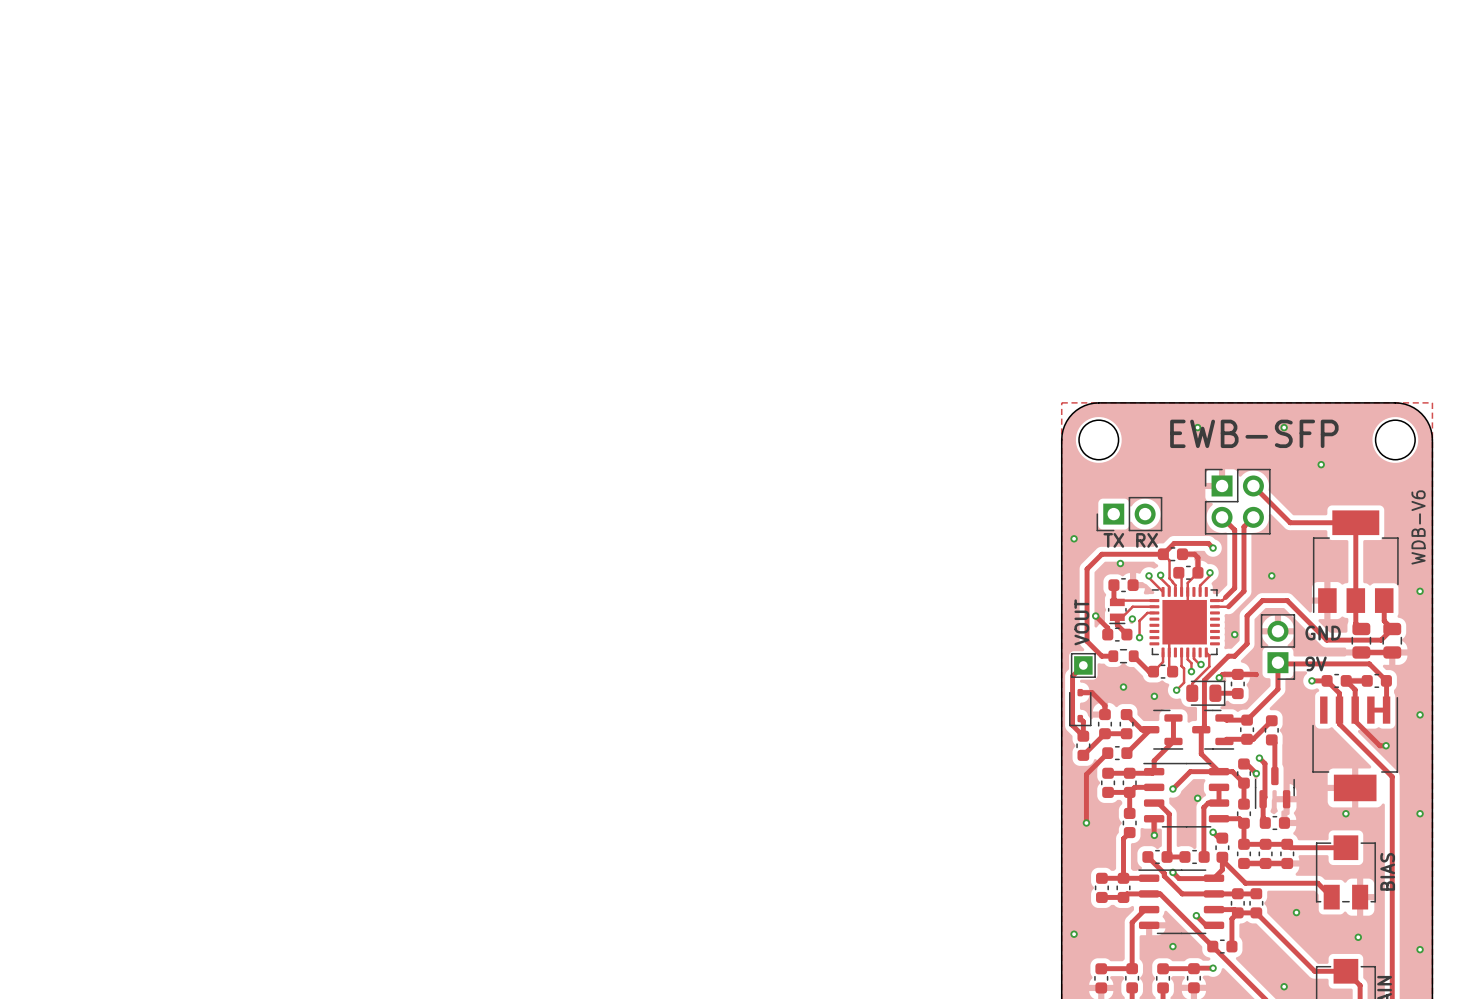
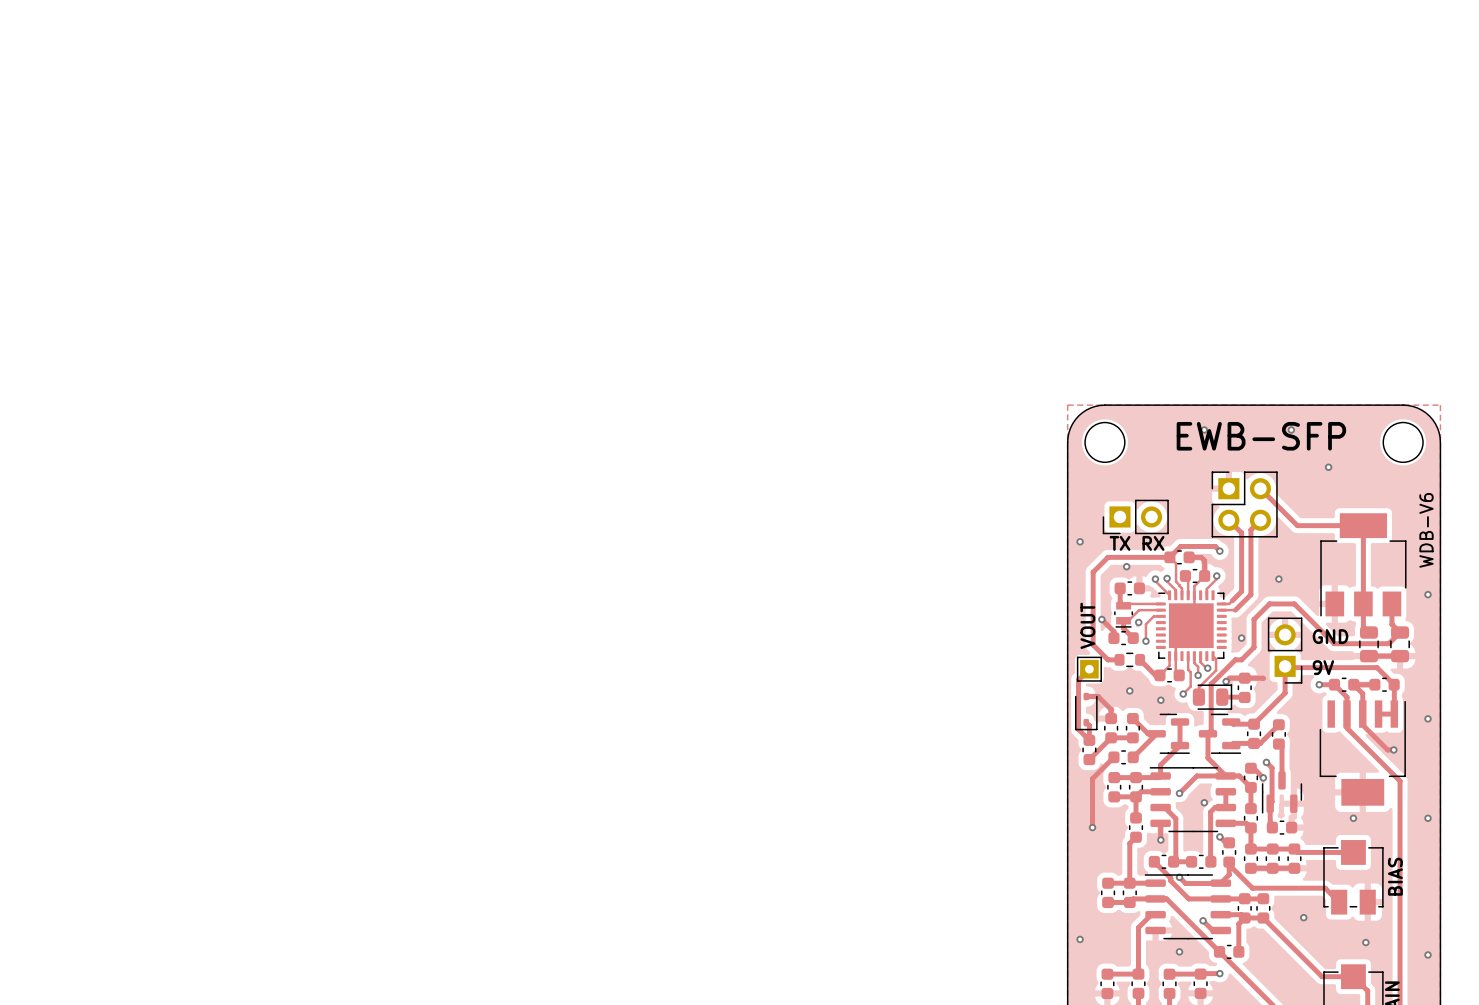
via: (1284, 986) -> none

